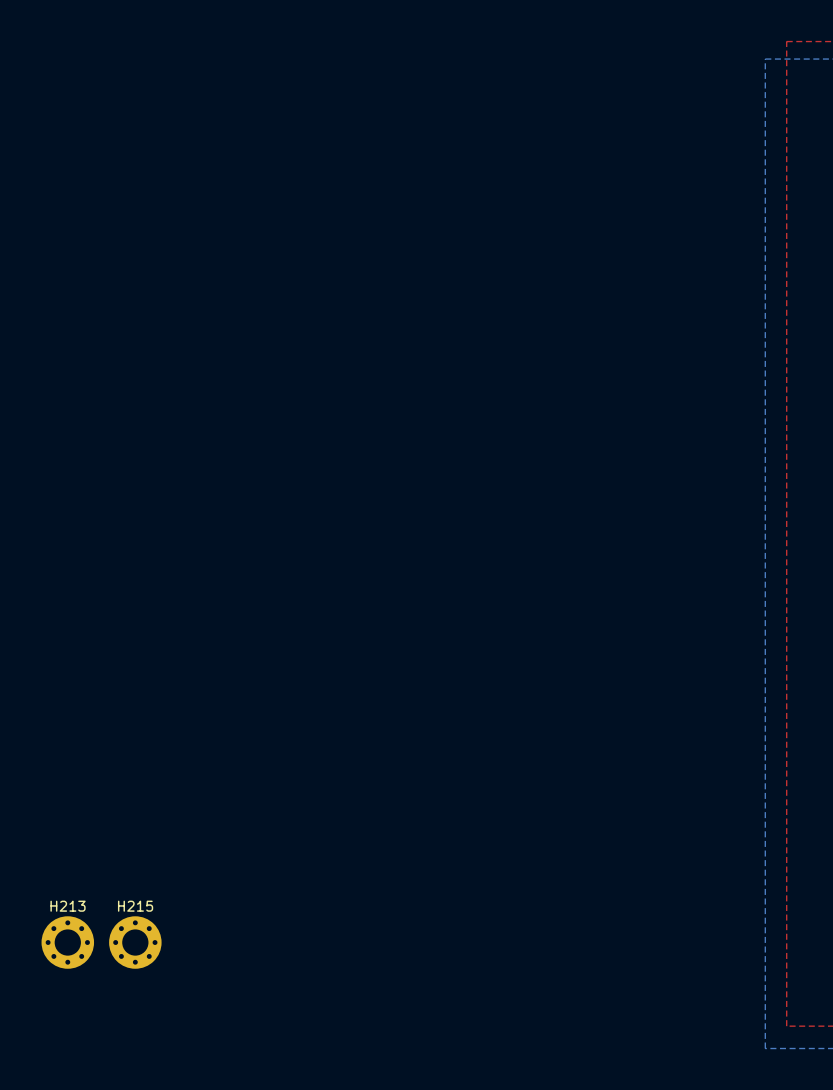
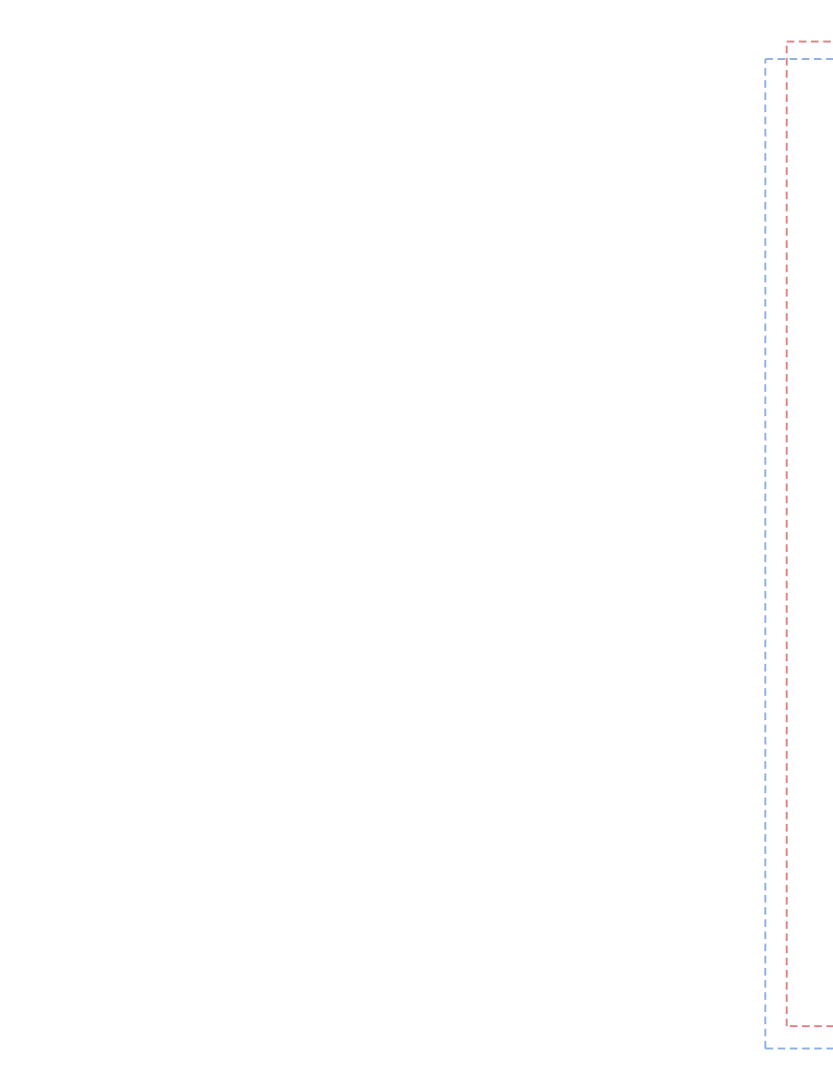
H213: (67, 942) -> none
H215: (135, 942) -> none

